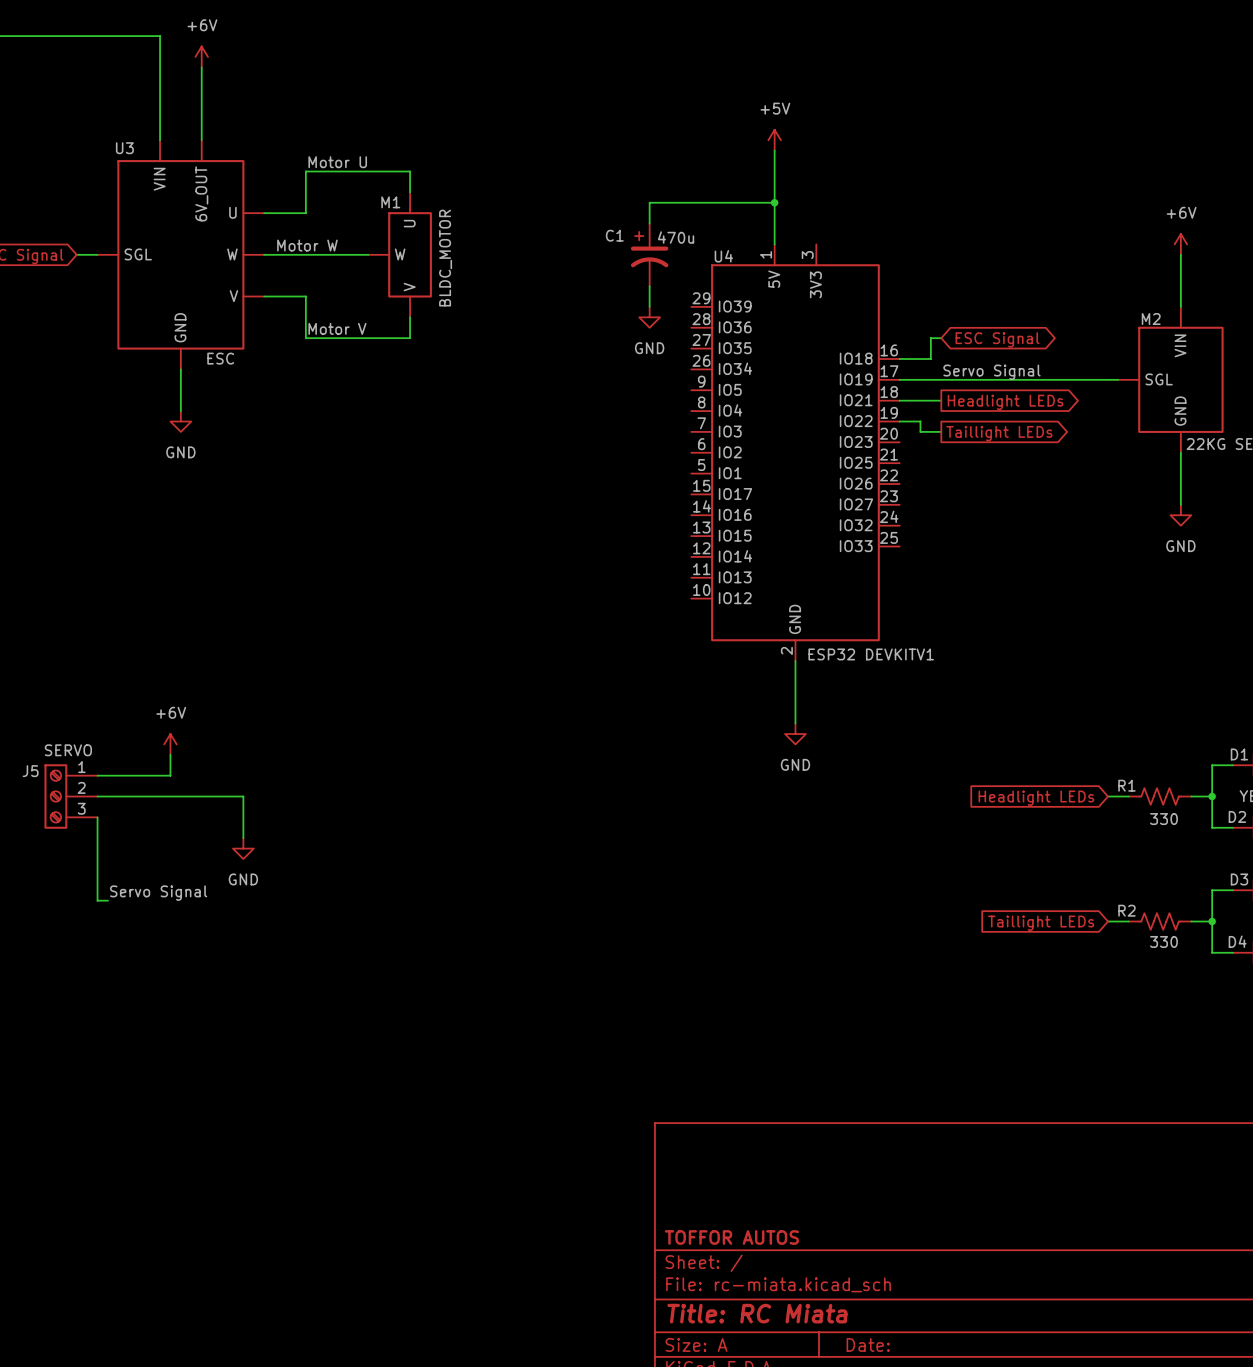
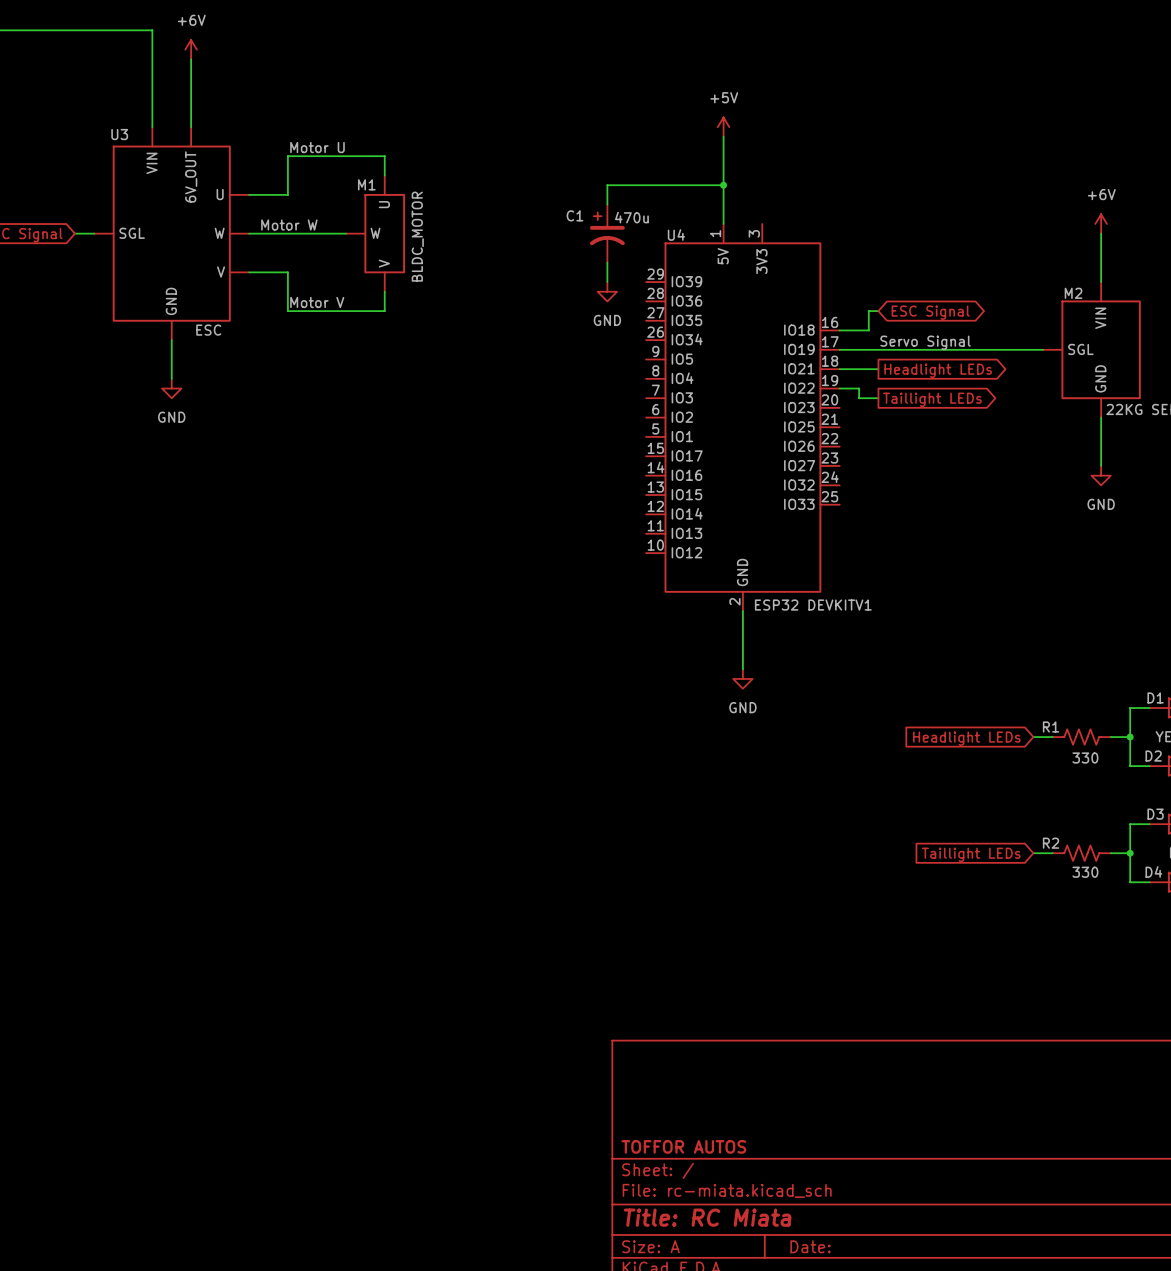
power symbol: +6V (170, 744) -> none
wire: (170, 754) (170, 775) (97, 775) -> none
J5: SERVO (70, 796) -> none
wire: (97, 796) (243, 796) (243, 838) -> none
wire: (97, 817) (97, 900) (107, 900) -> none
power symbol: GND (243, 848) -> none
label: Servo Signal (158, 893) -> none

